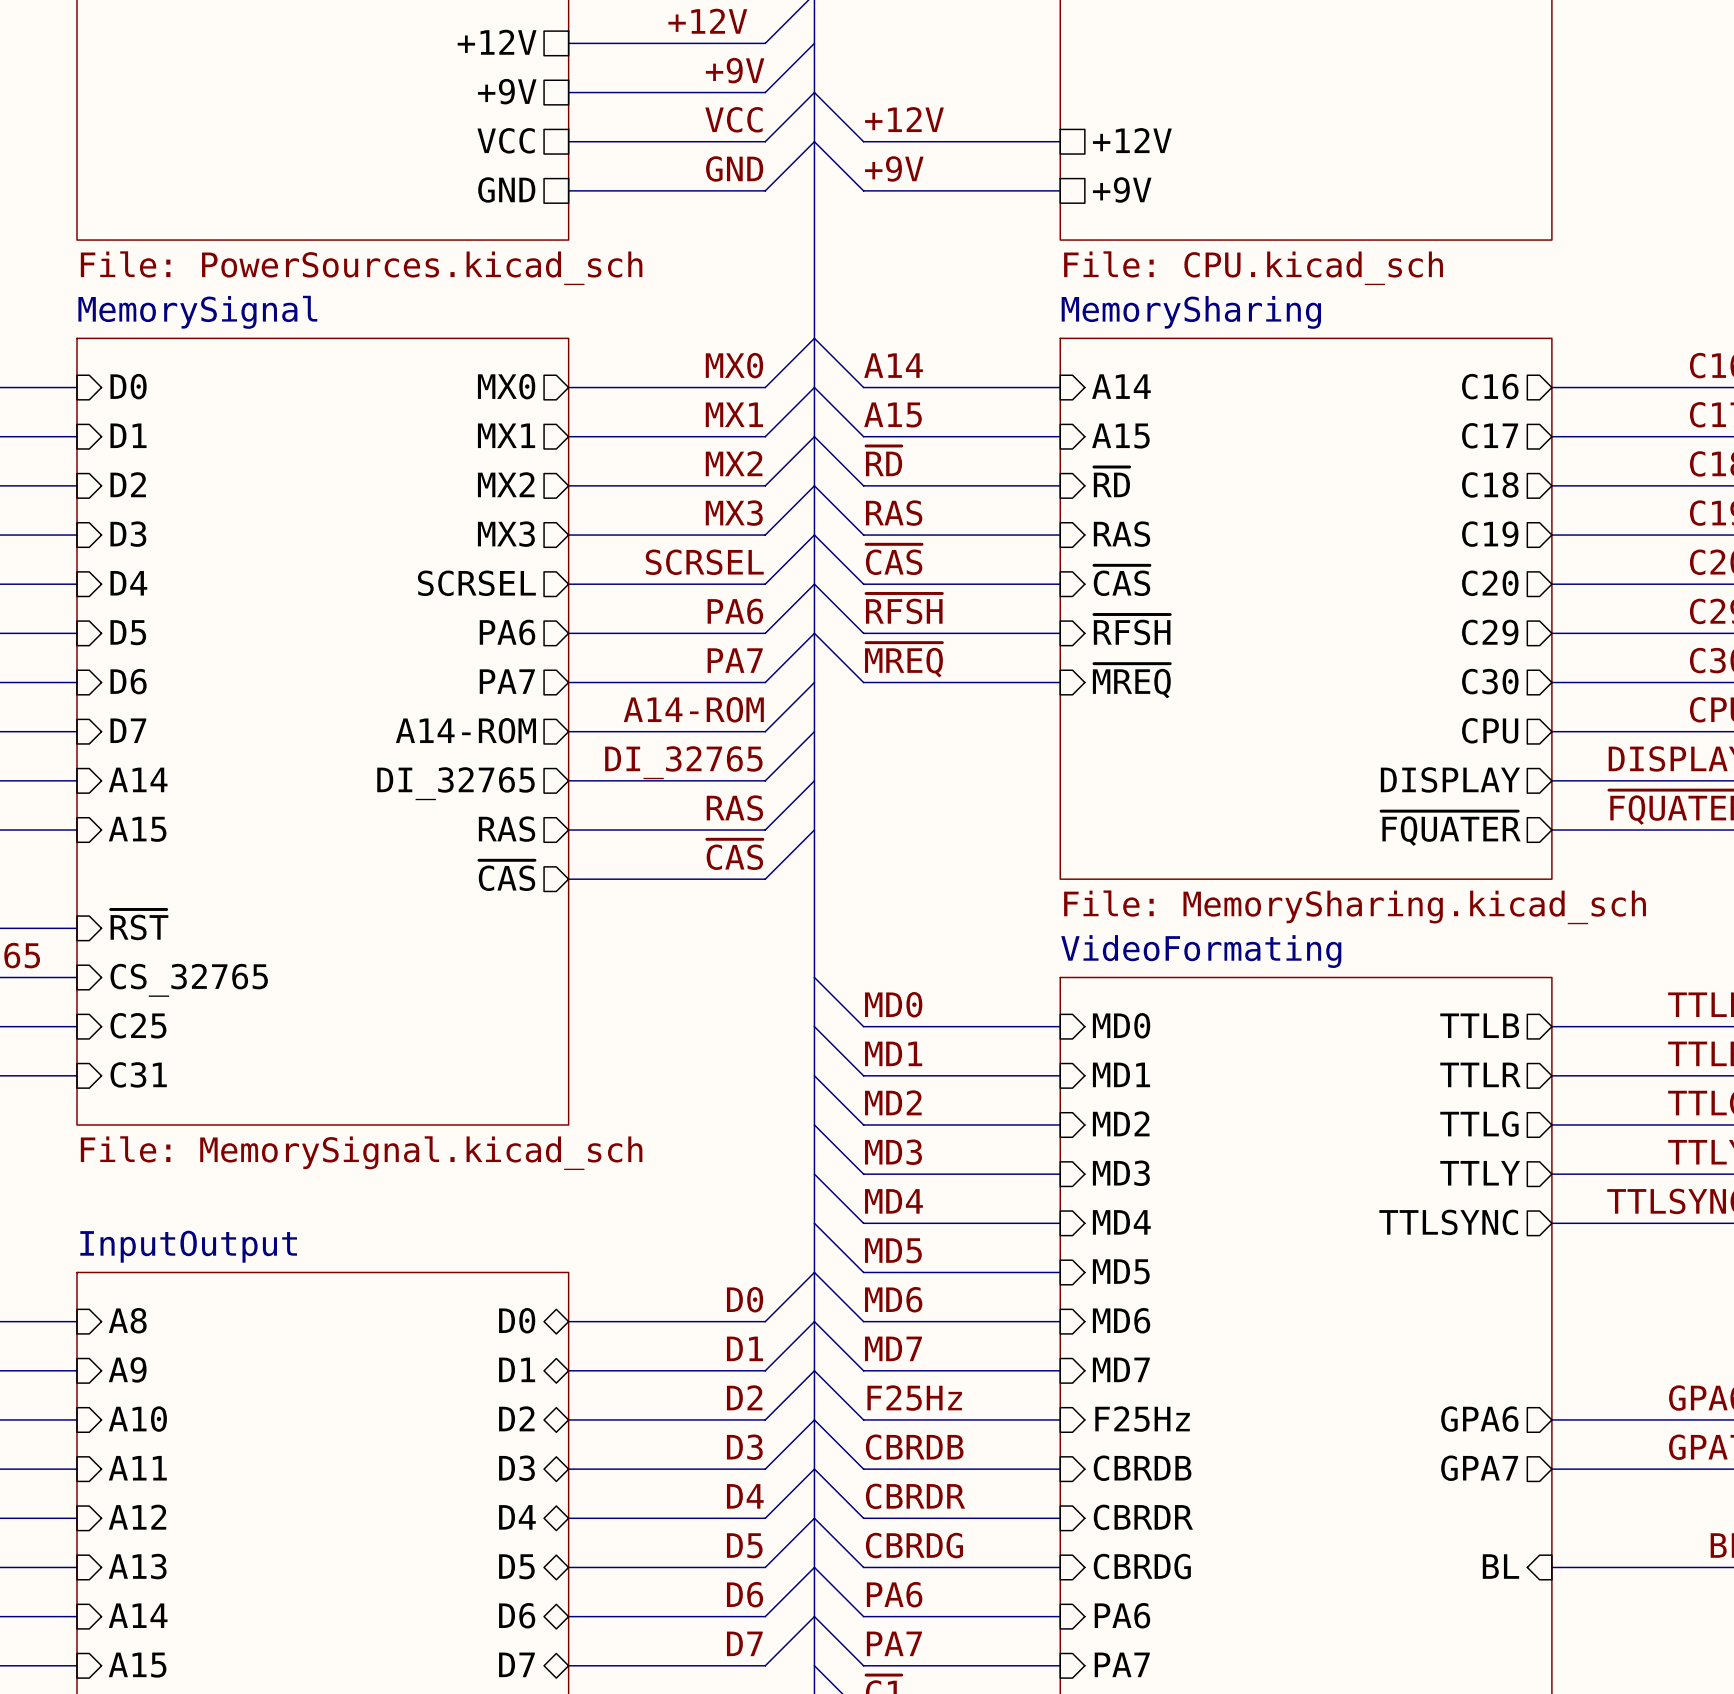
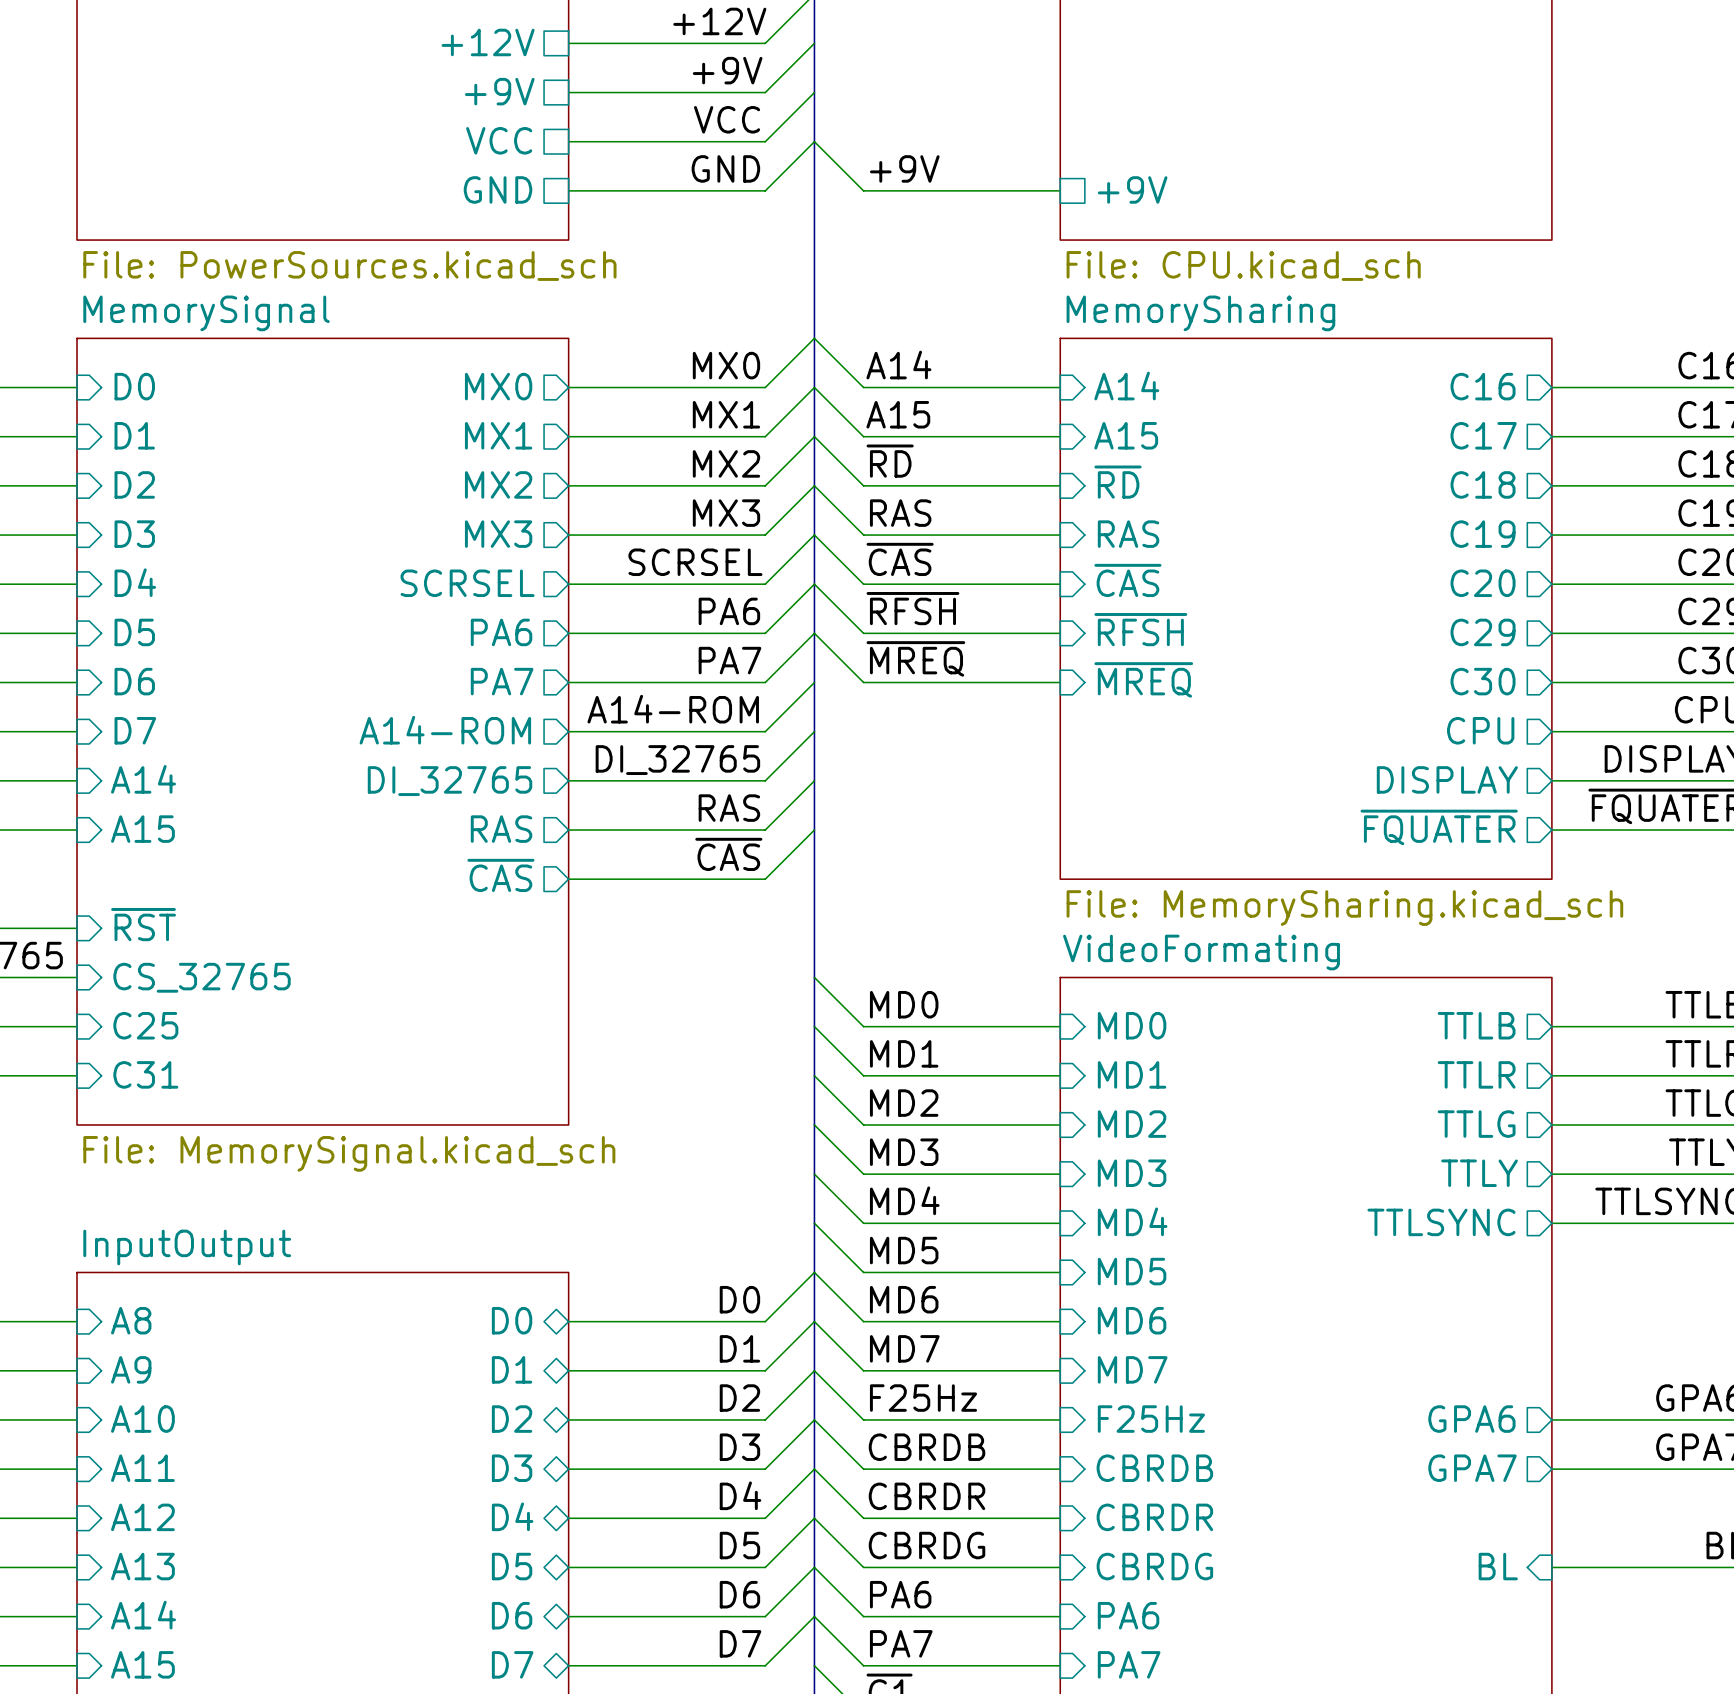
wire: (814, 92) (863, 141) (1060, 141) -> none
label: +12V (904, 119) -> none
sheet pin: +12V (1132, 140) -> none

